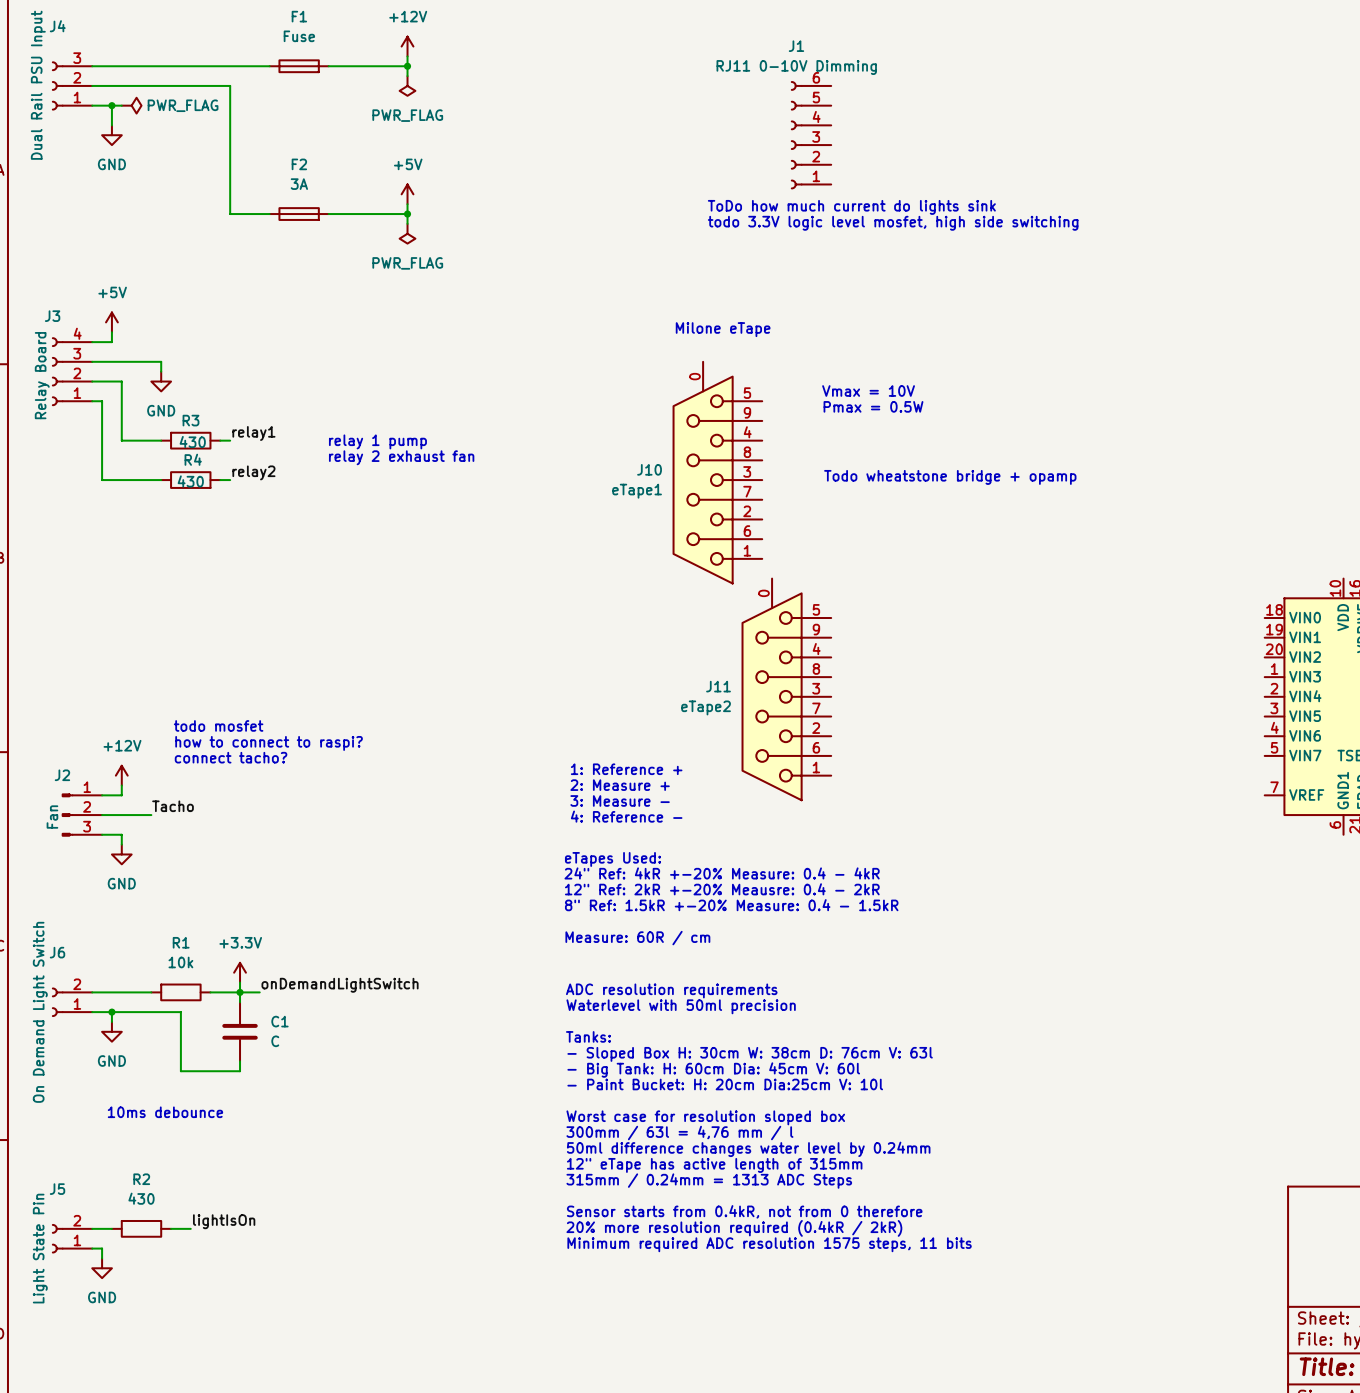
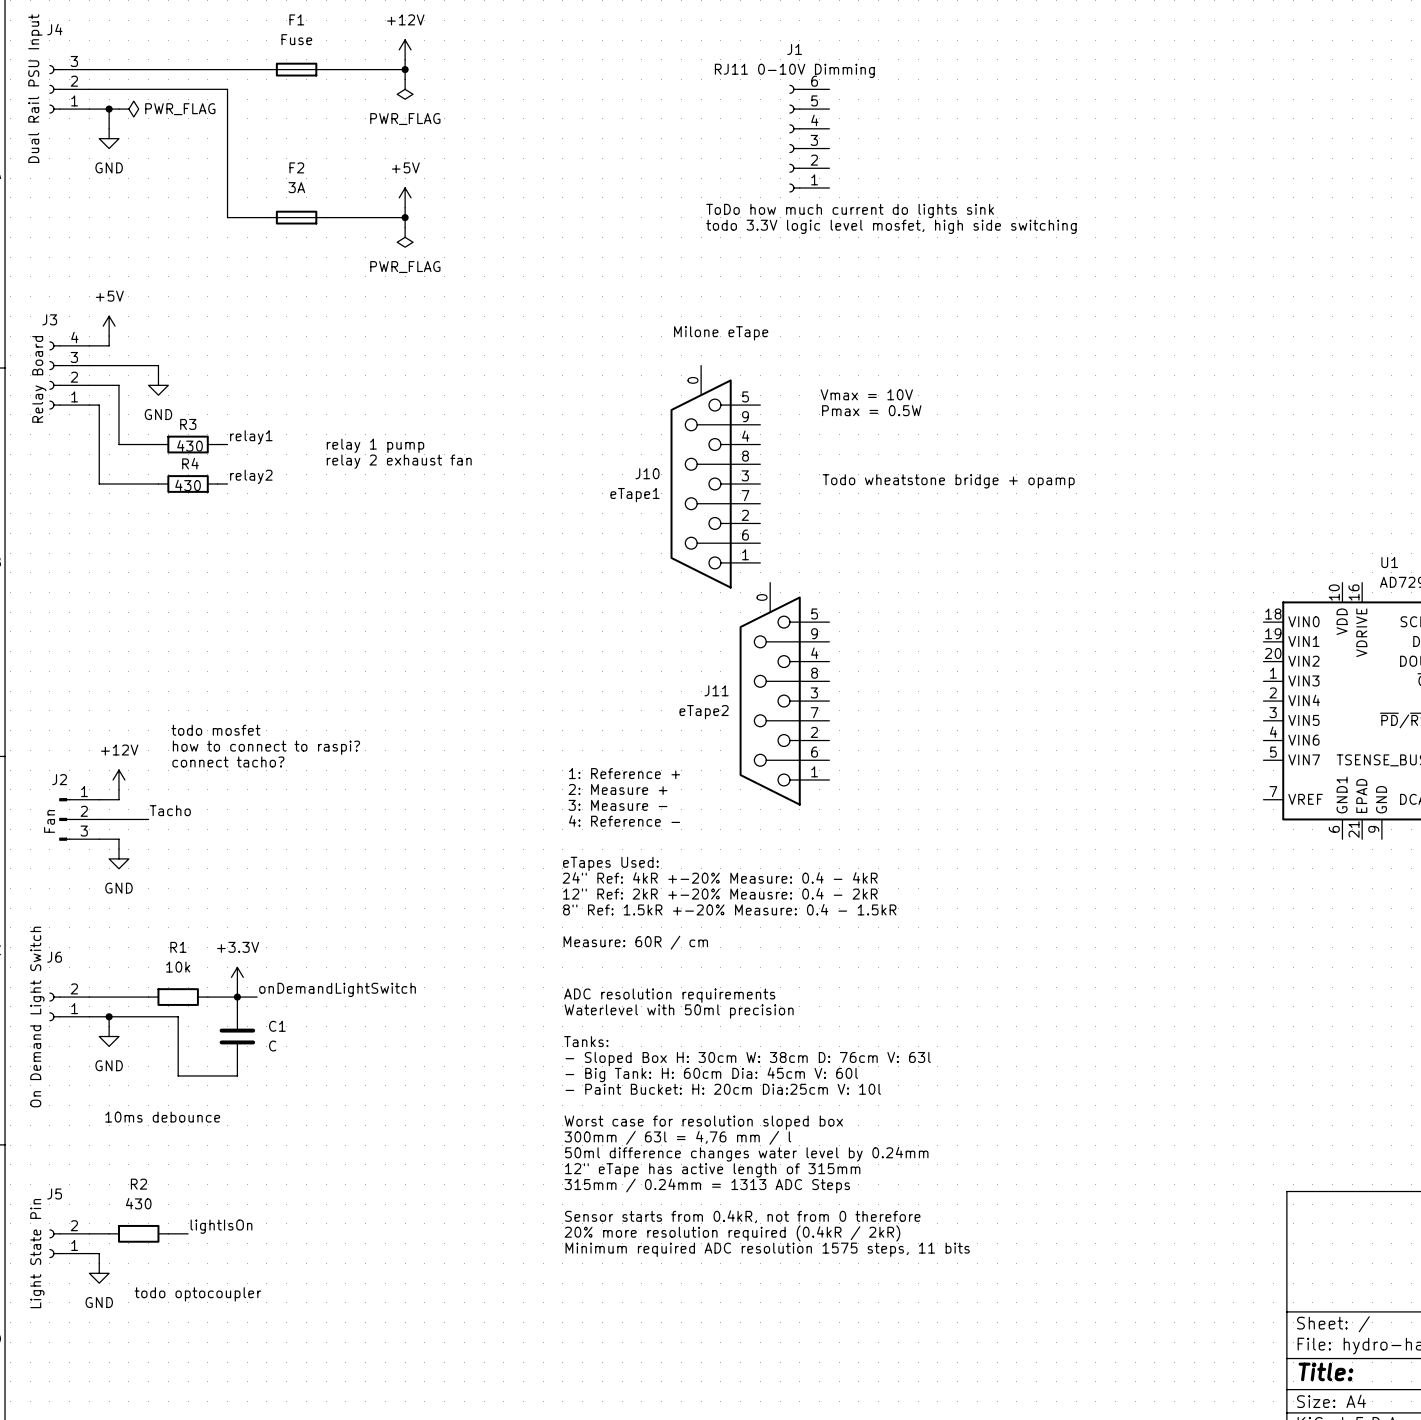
text: none -> todo optocoupler (197, 1294)

